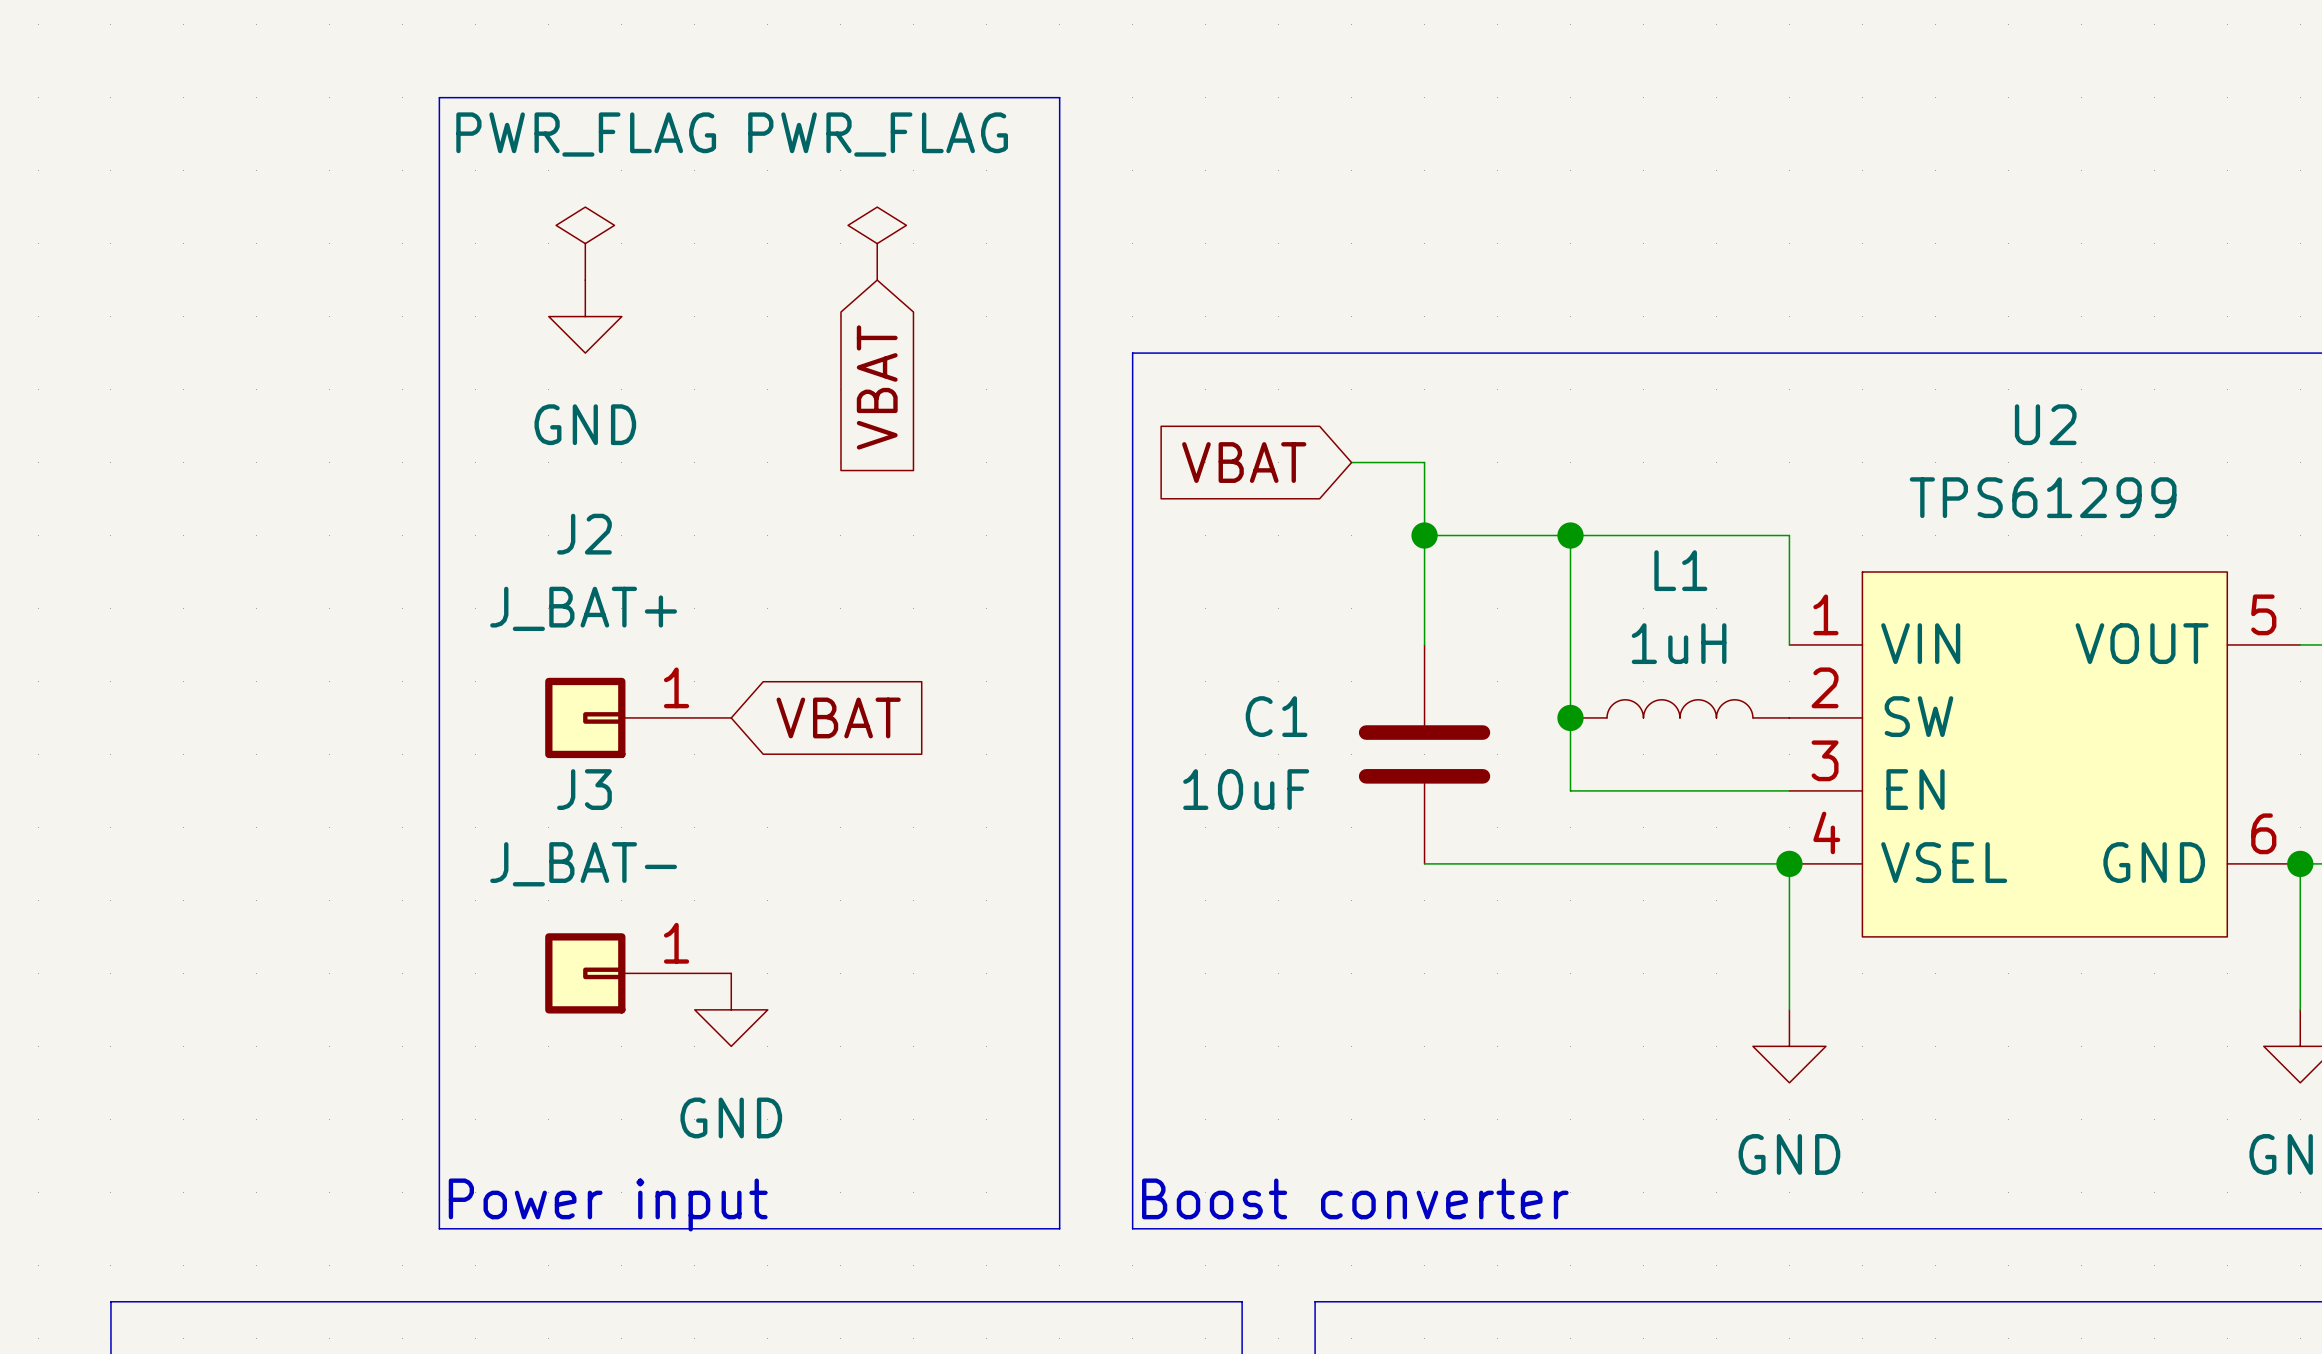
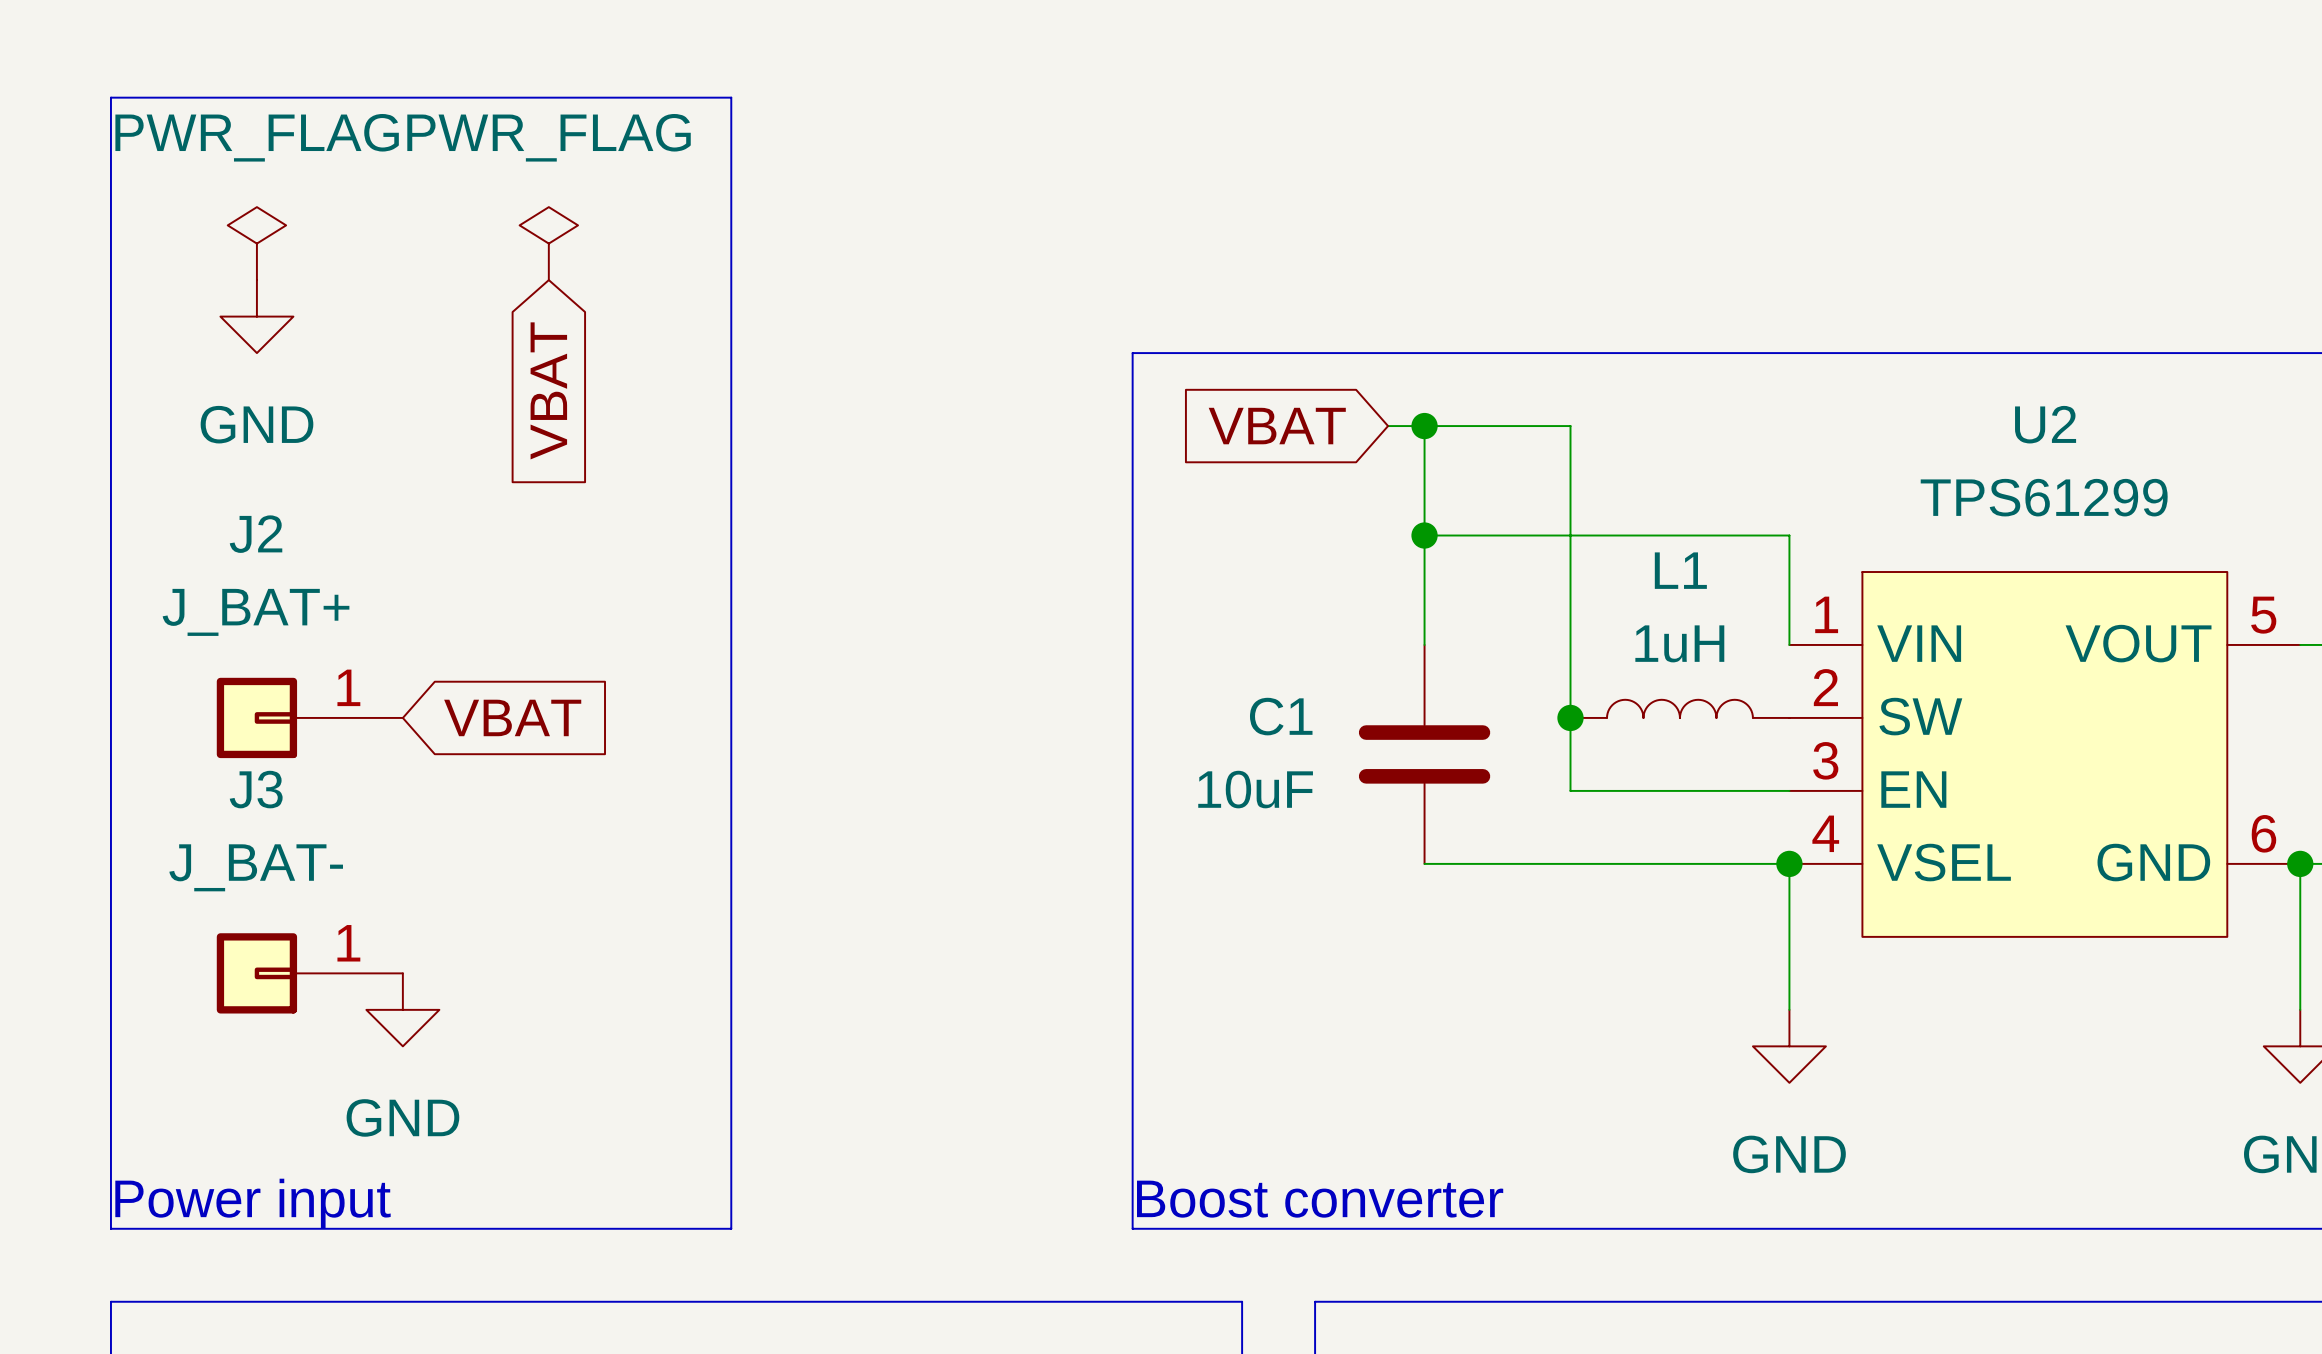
line: (439, 97) (439, 1228) -> (439, 97) (110, 97) (110, 1228) (439, 1228)
line: (731, 97) (1059, 97) (1059, 1228) (731, 1228) -> (731, 97) (731, 1228)
power symbol: none -> PWR_FLAG (256, 243)
power symbol position: PWR_FLAG (585, 243) -> PWR_FLAG (548, 243)
power symbol: PWR_FLAG (877, 243) -> none
power symbol position: GND (585, 316) -> GND (256, 316)
global label: none -> VBAT (548, 390)
global label: VBAT (877, 387) -> none
wire: none -> (1388, 426) (1570, 426) (1570, 535)
junction: none -> (1424, 426)
global label position: VBAT (1244, 462) -> VBAT (1277, 426)
wire: (1351, 462) (1424, 462) -> (1424, 426) (1424, 462)
junction: (1570, 535) -> none
global label: none -> VBAT (512, 717)
J2 position: (638, 717) -> (309, 717)
global label: VBAT (838, 717) -> none
J3 position: (638, 973) -> (309, 973)
power symbol position: GND (731, 1009) -> GND (402, 1009)
text position: Power input (608, 1204) -> Power input (252, 1203)

